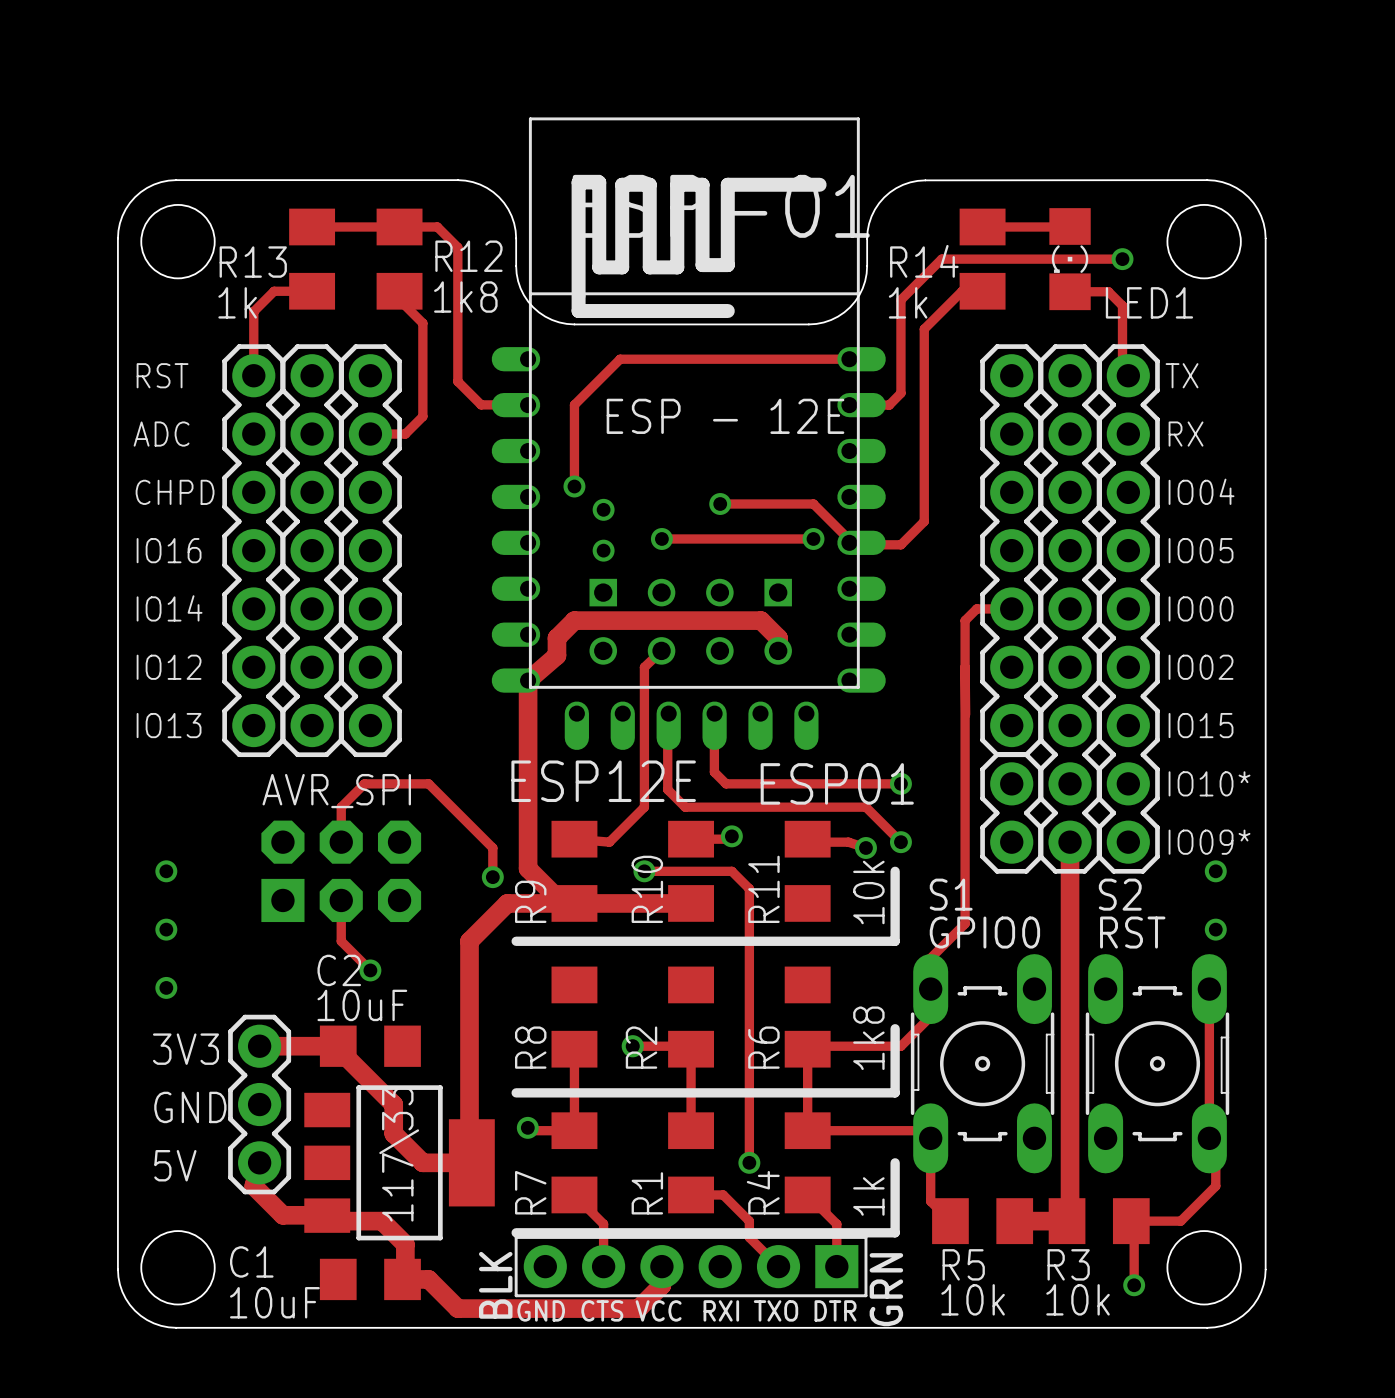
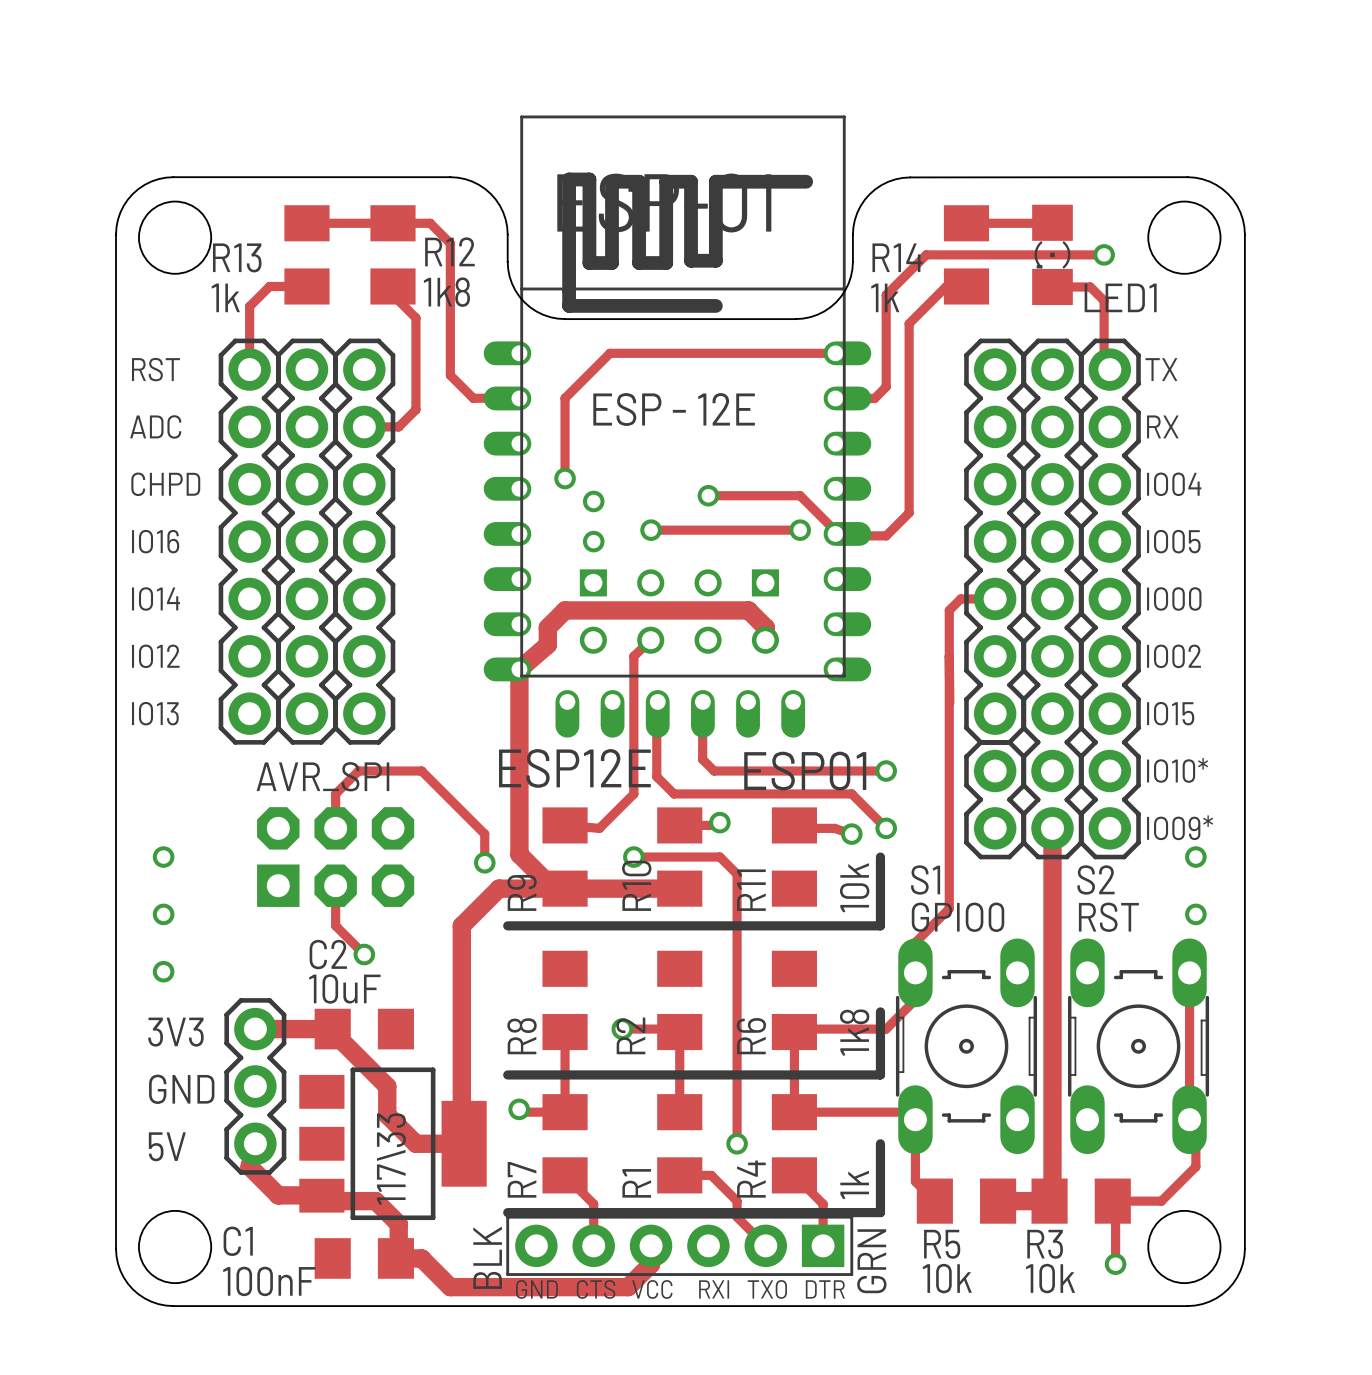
C1 value: 10uF (274, 1302) -> 100nF (269, 1281)

